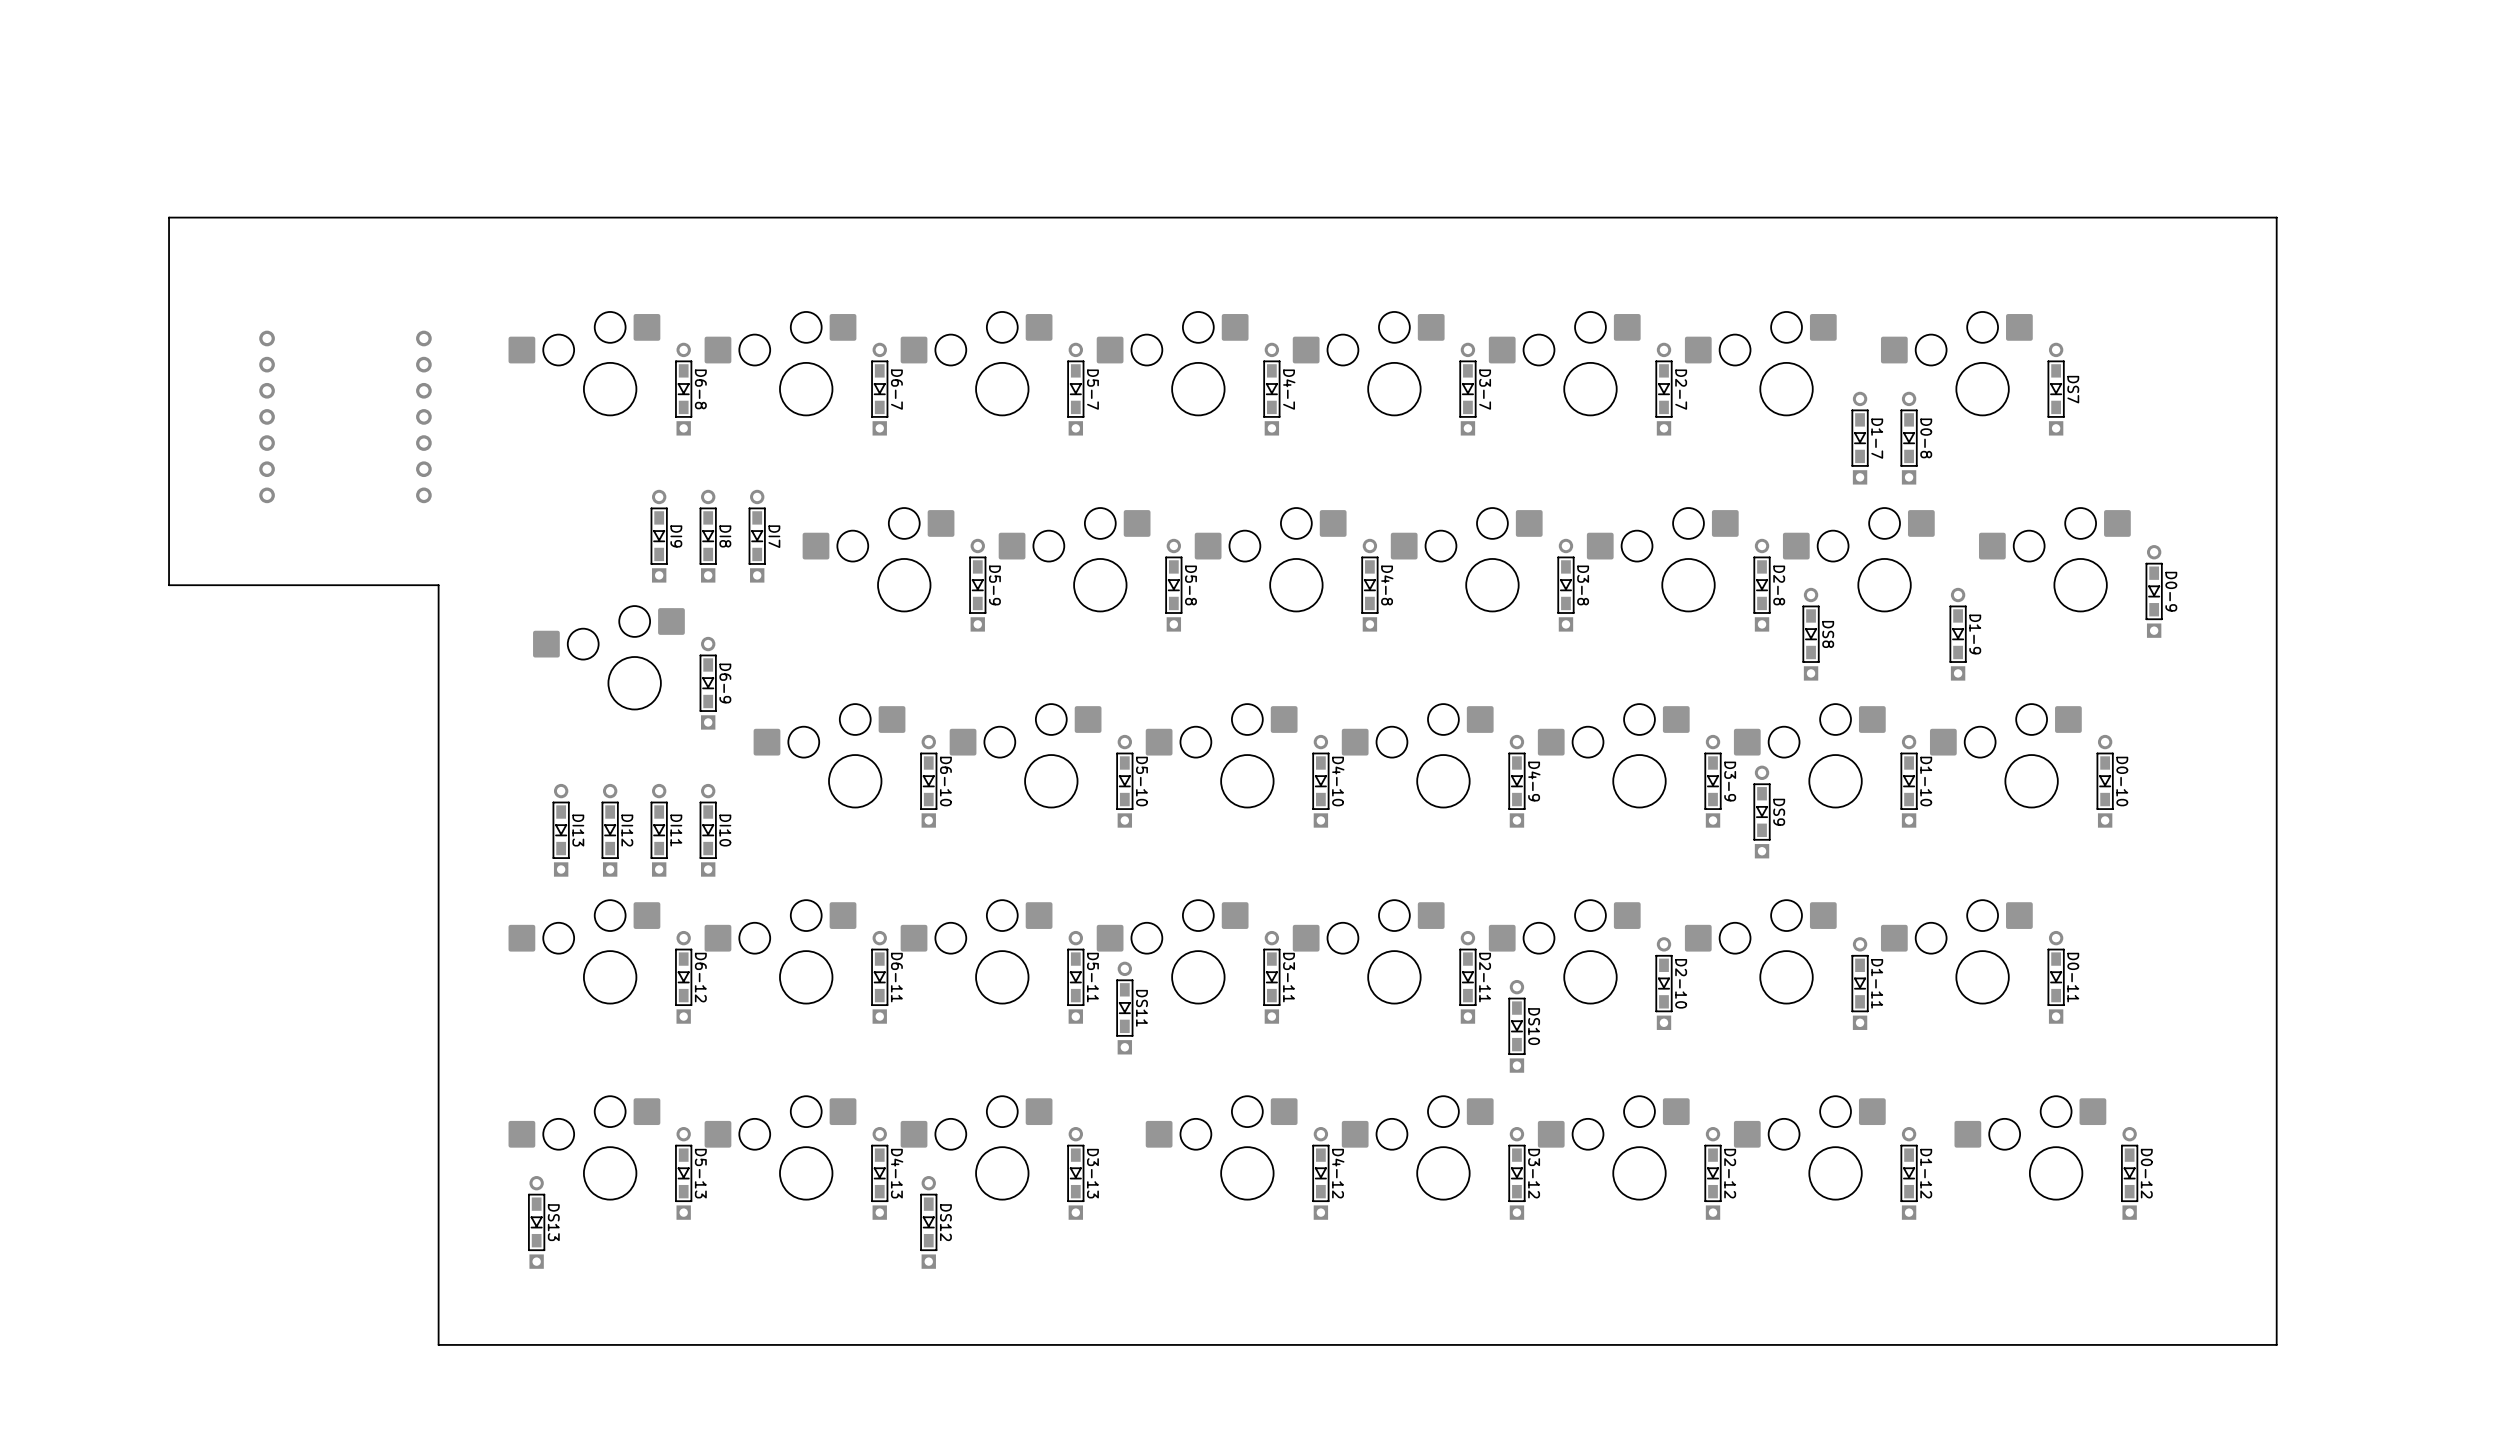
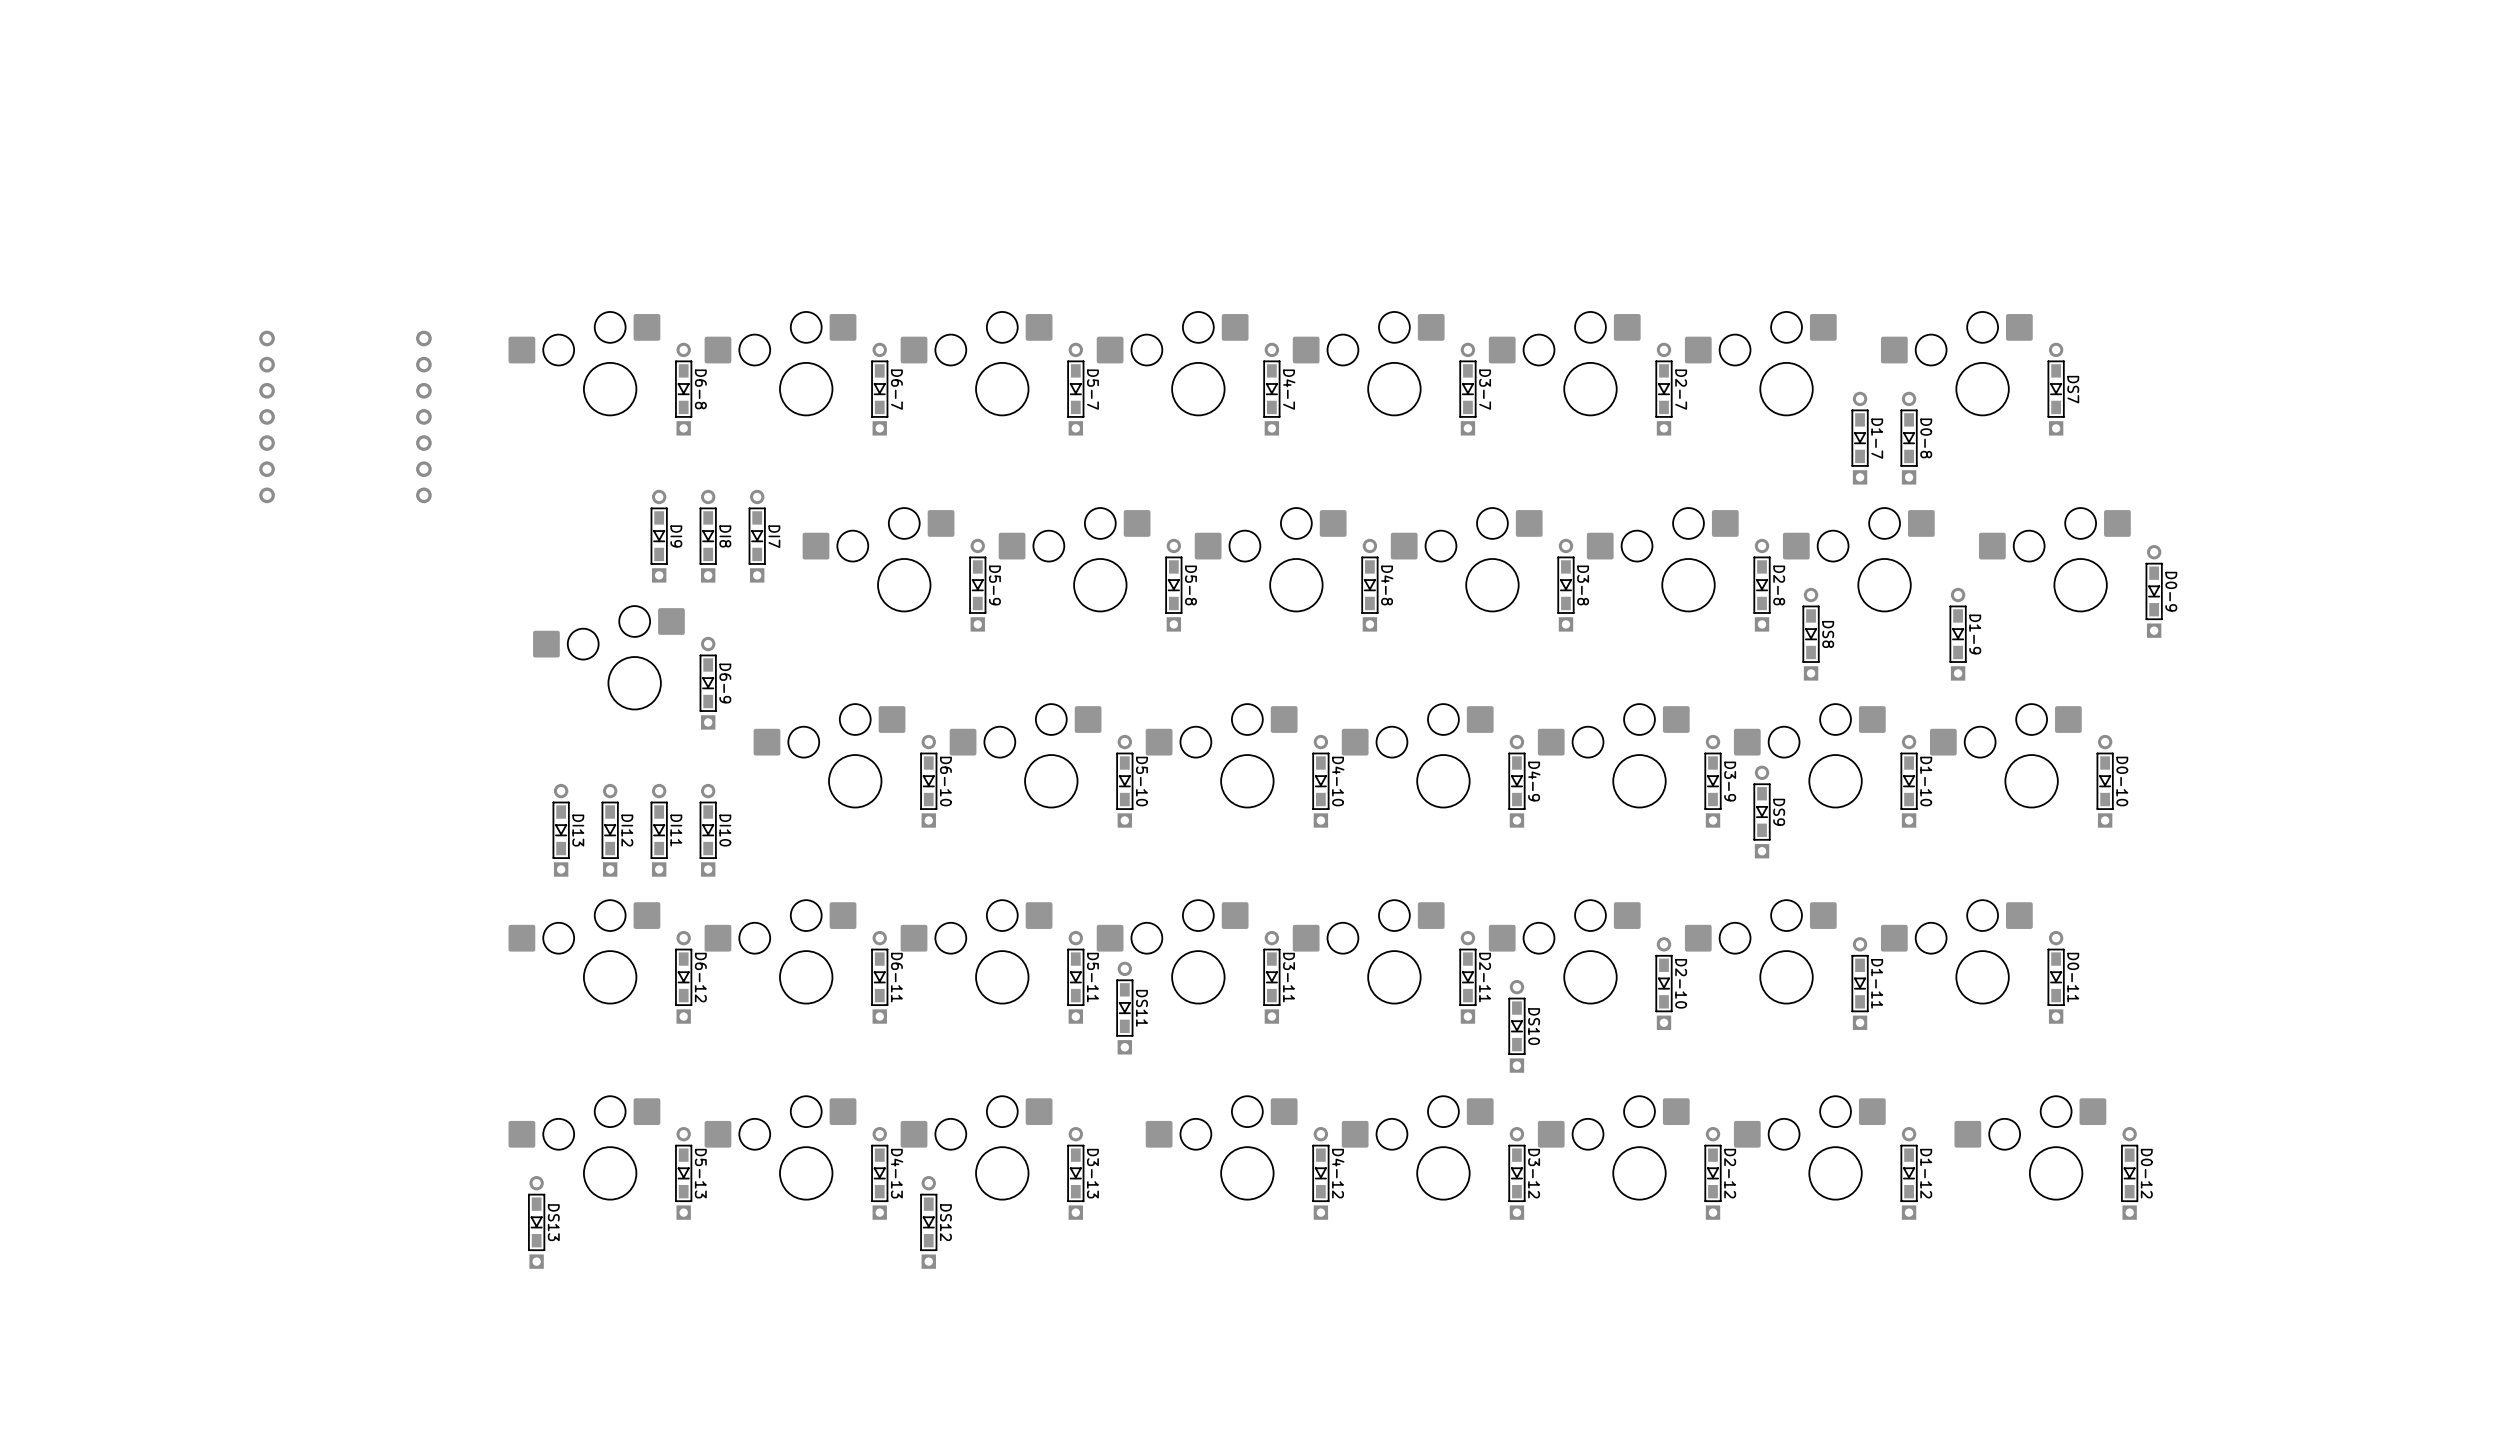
board edge: (2276, 217) (2276, 1344) (438, 1344) (438, 585) (169, 585) (169, 217) (2276, 217) -> none

